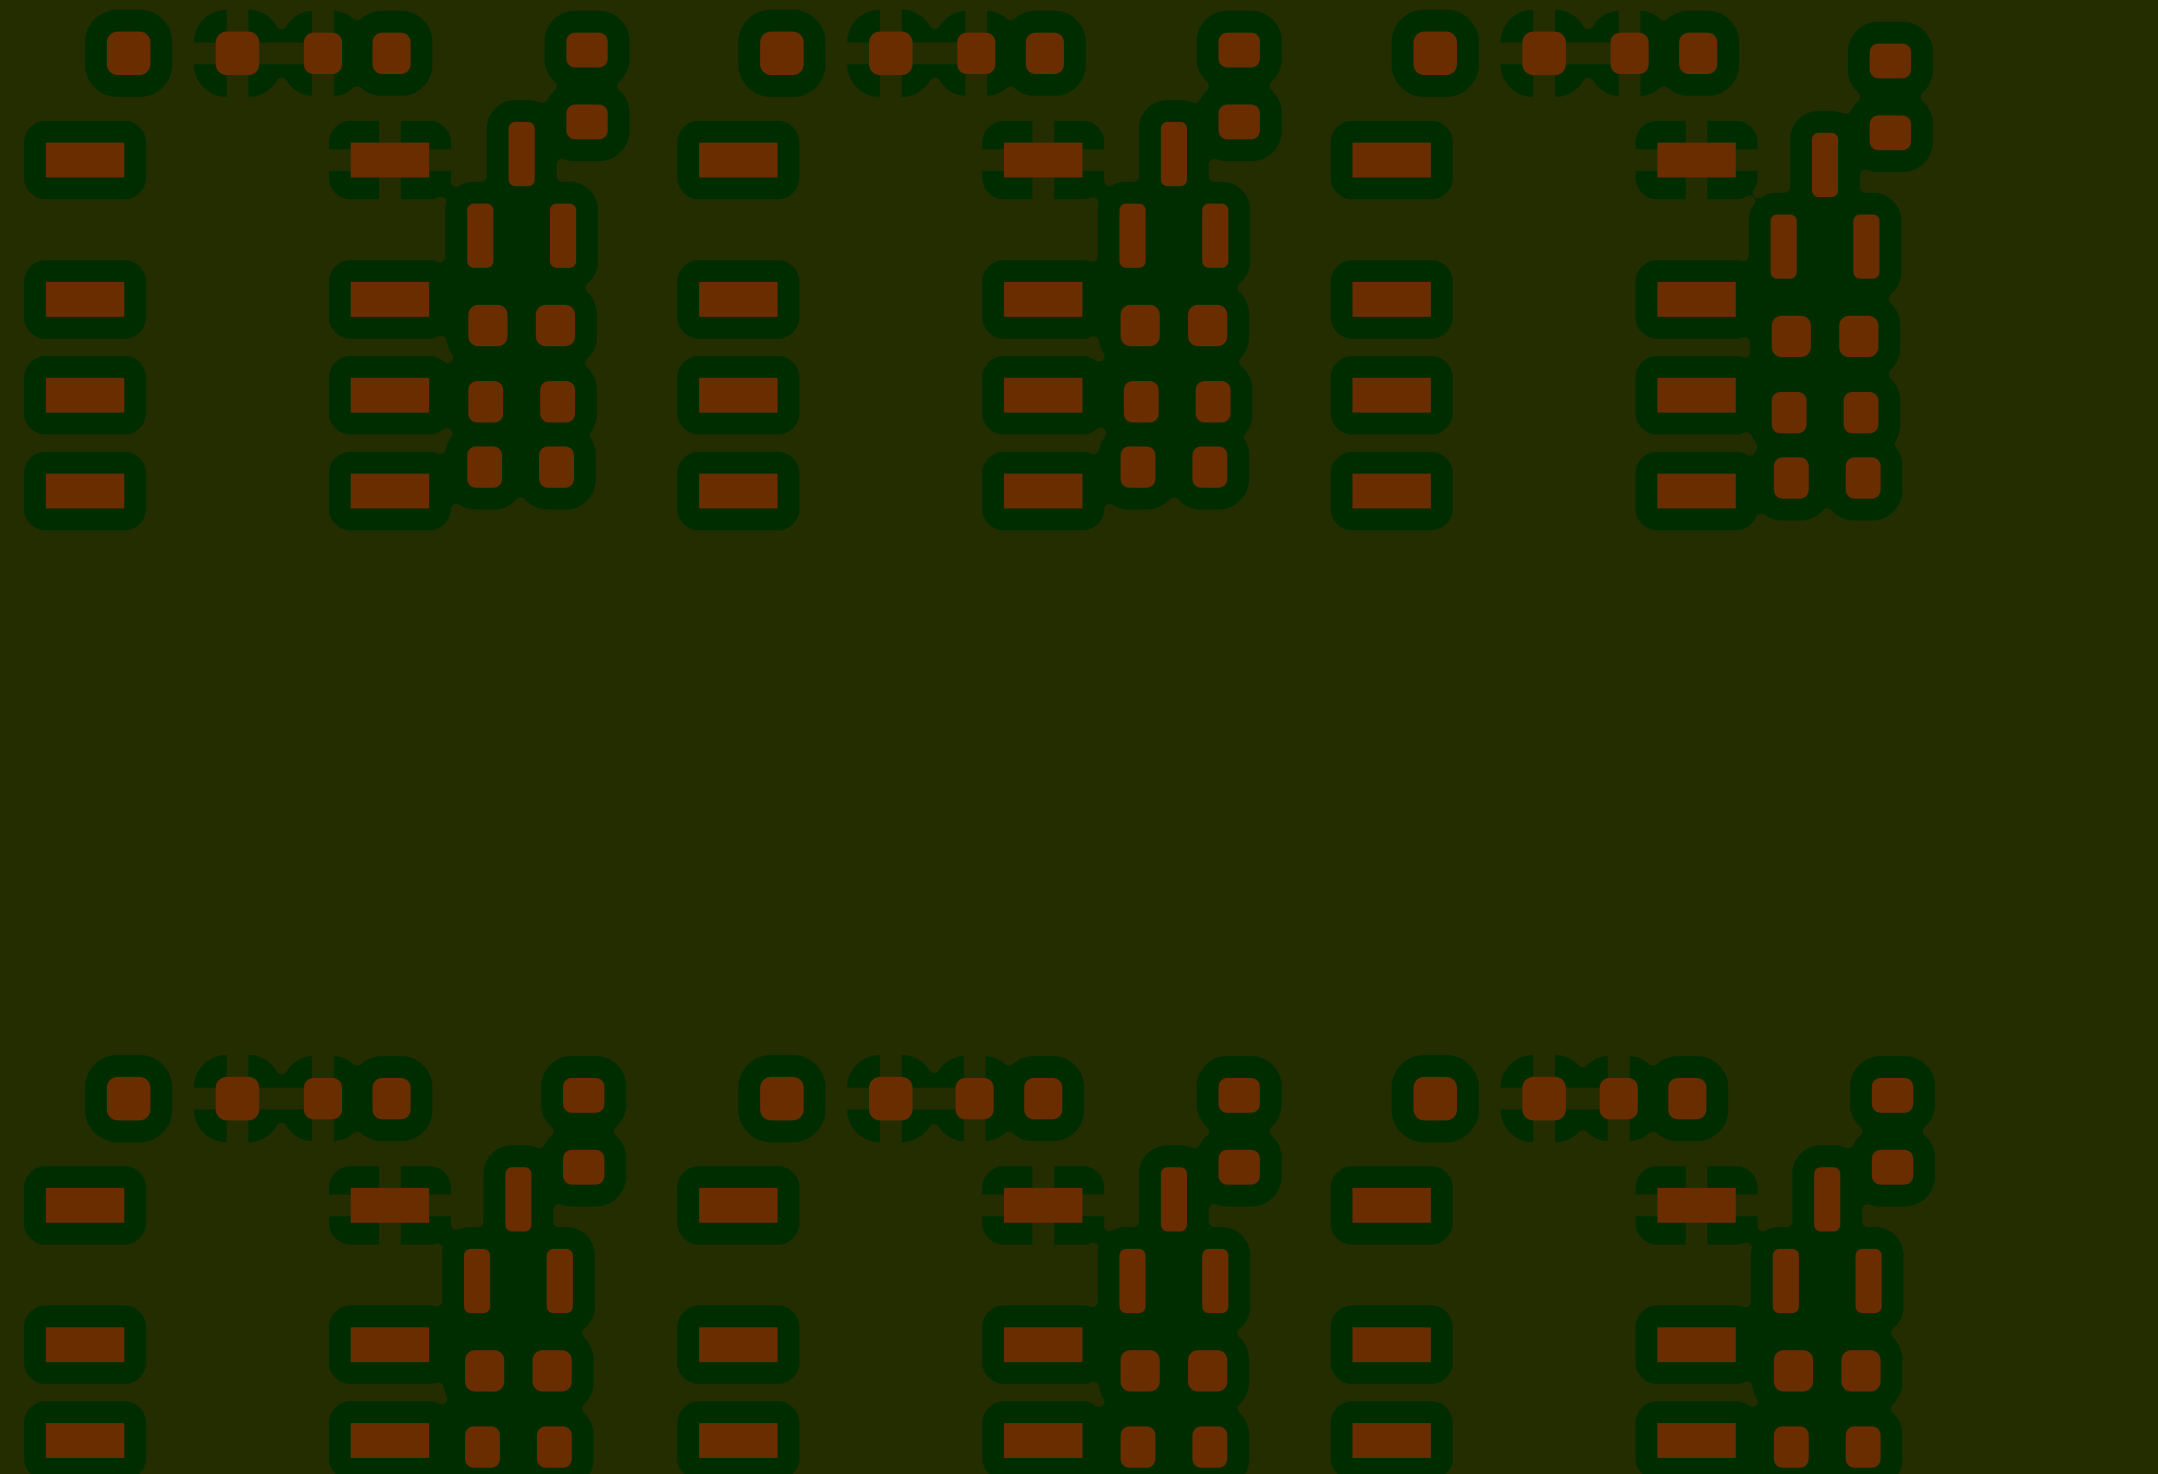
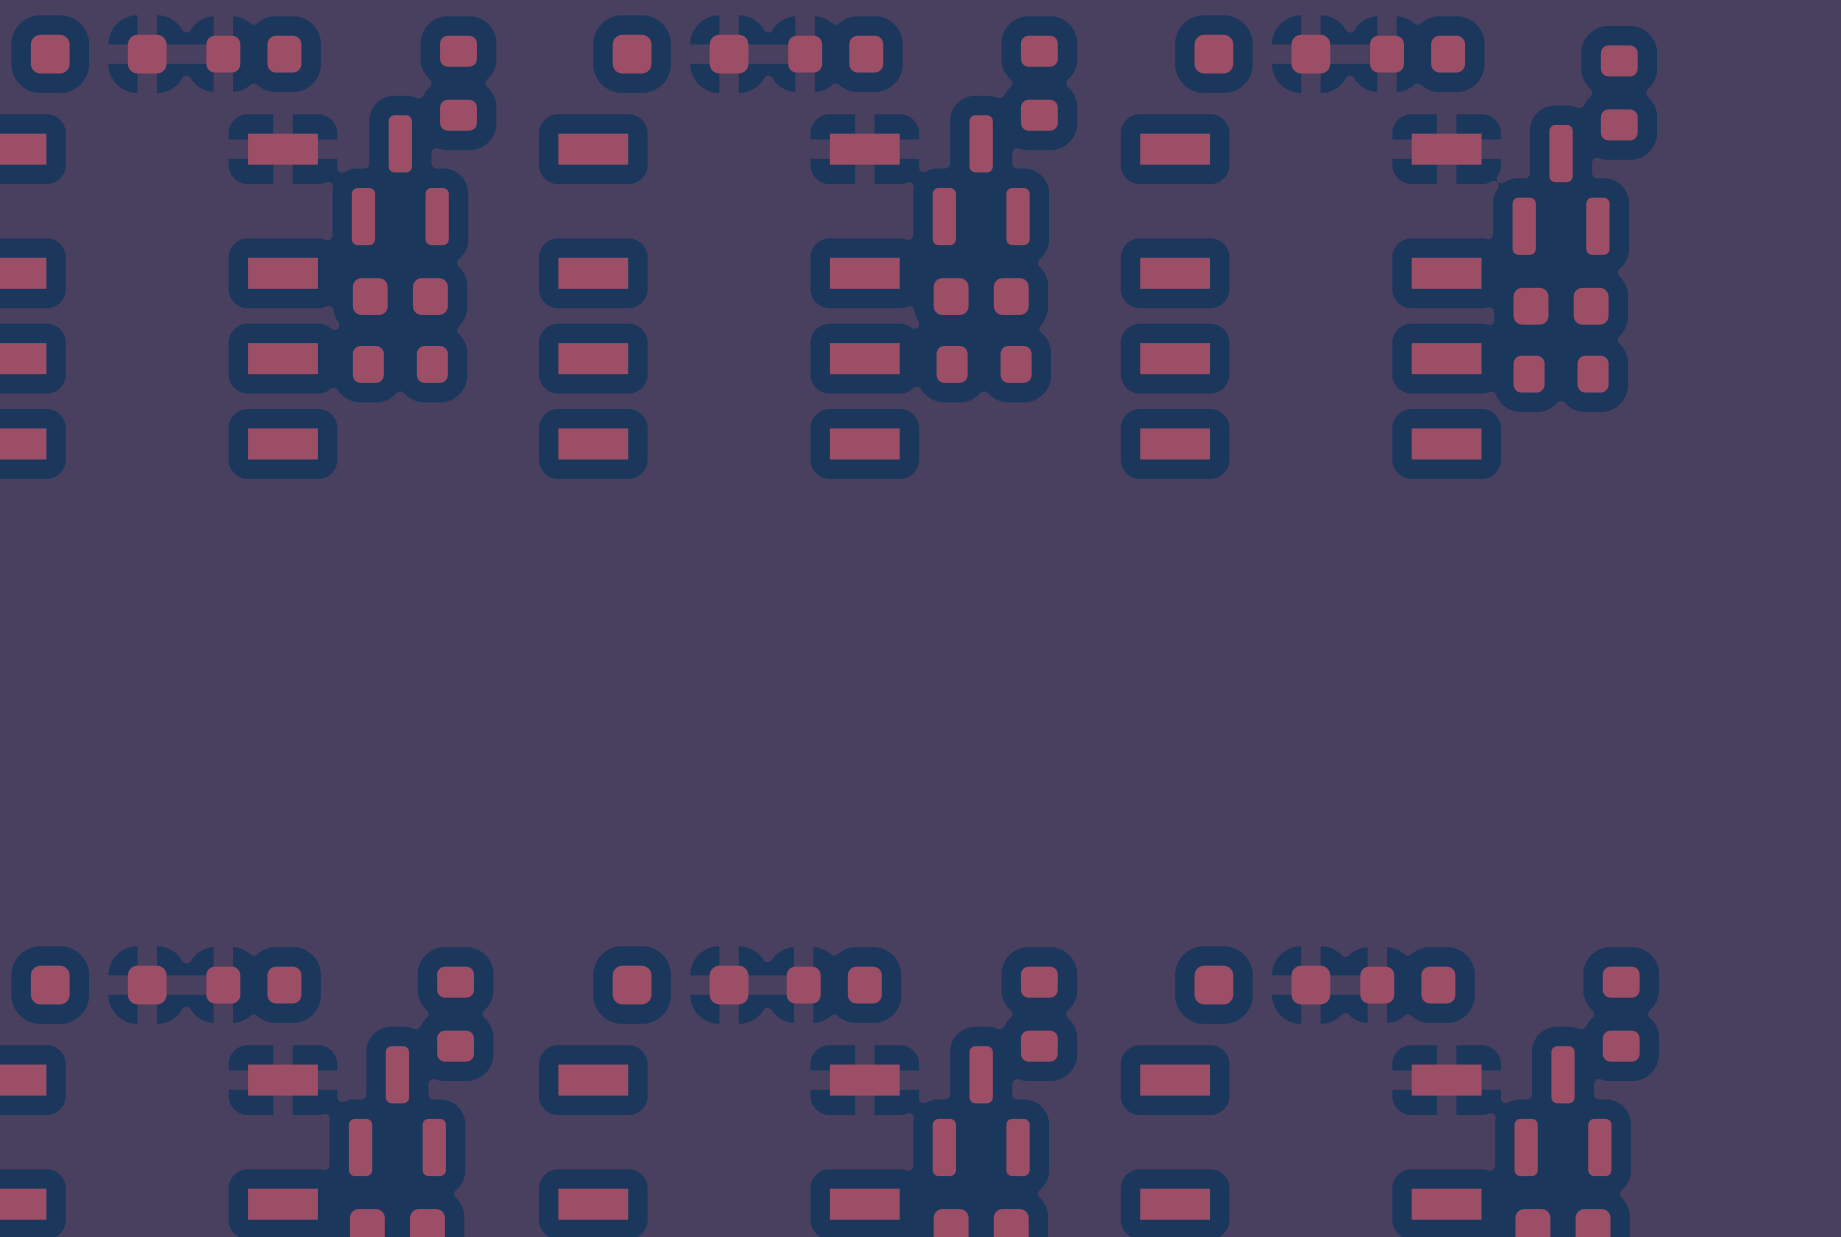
part: (520, 467) -> none
part: (1173, 467) -> none
part: (1827, 477) -> none

